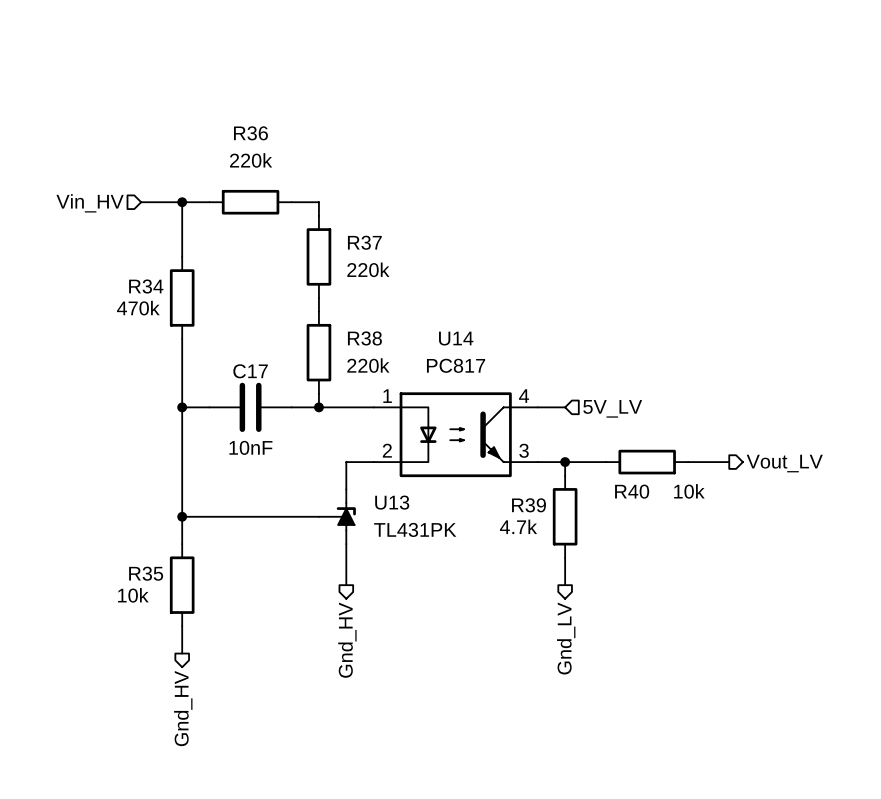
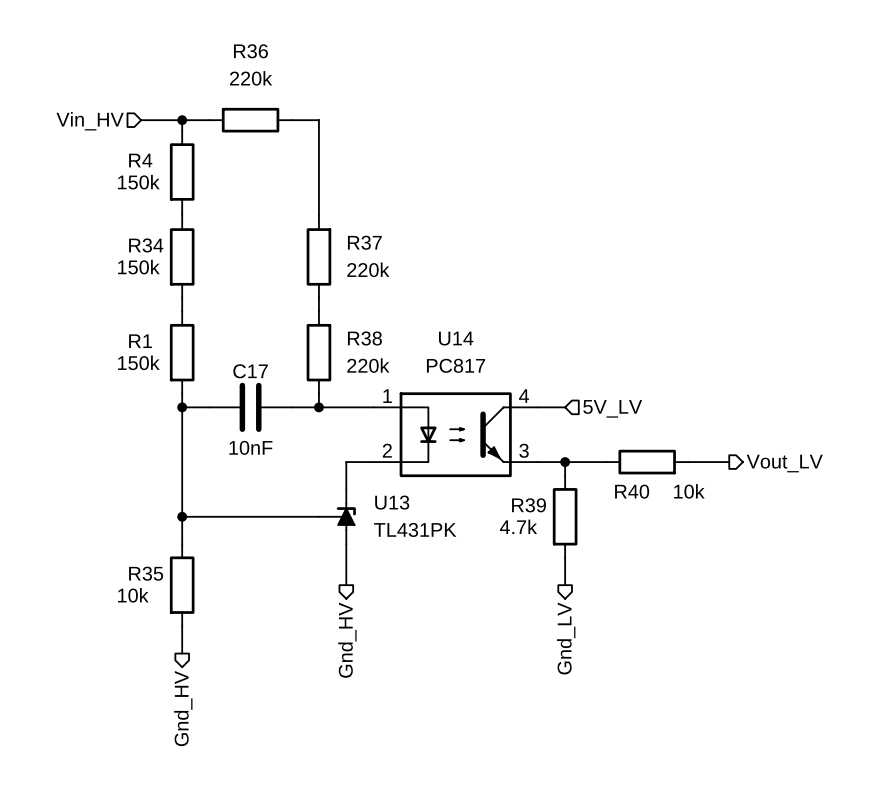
junction: none -> (182, 120)
R4: none -> 150k (182, 171)
wire: (141, 202) (209, 202) -> (141, 120) (209, 120)
junction: (182, 202) -> none
R36 position: (250, 202) -> (250, 120)
wire: (291, 202) (318, 202) -> (291, 120) (318, 120) (318, 202)
hierarchical label position: Vin_HV (90, 203) -> Vin_HV (90, 121)
wire: (182, 215) (182, 256) -> none
wire: none -> (182, 297) (182, 311)
R34 position: (182, 297) -> (182, 256)
R34 value: 470k (138, 308) -> 150k (138, 267)
wire: (182, 338) (182, 393) -> none
R1: none -> 150k (182, 352)

